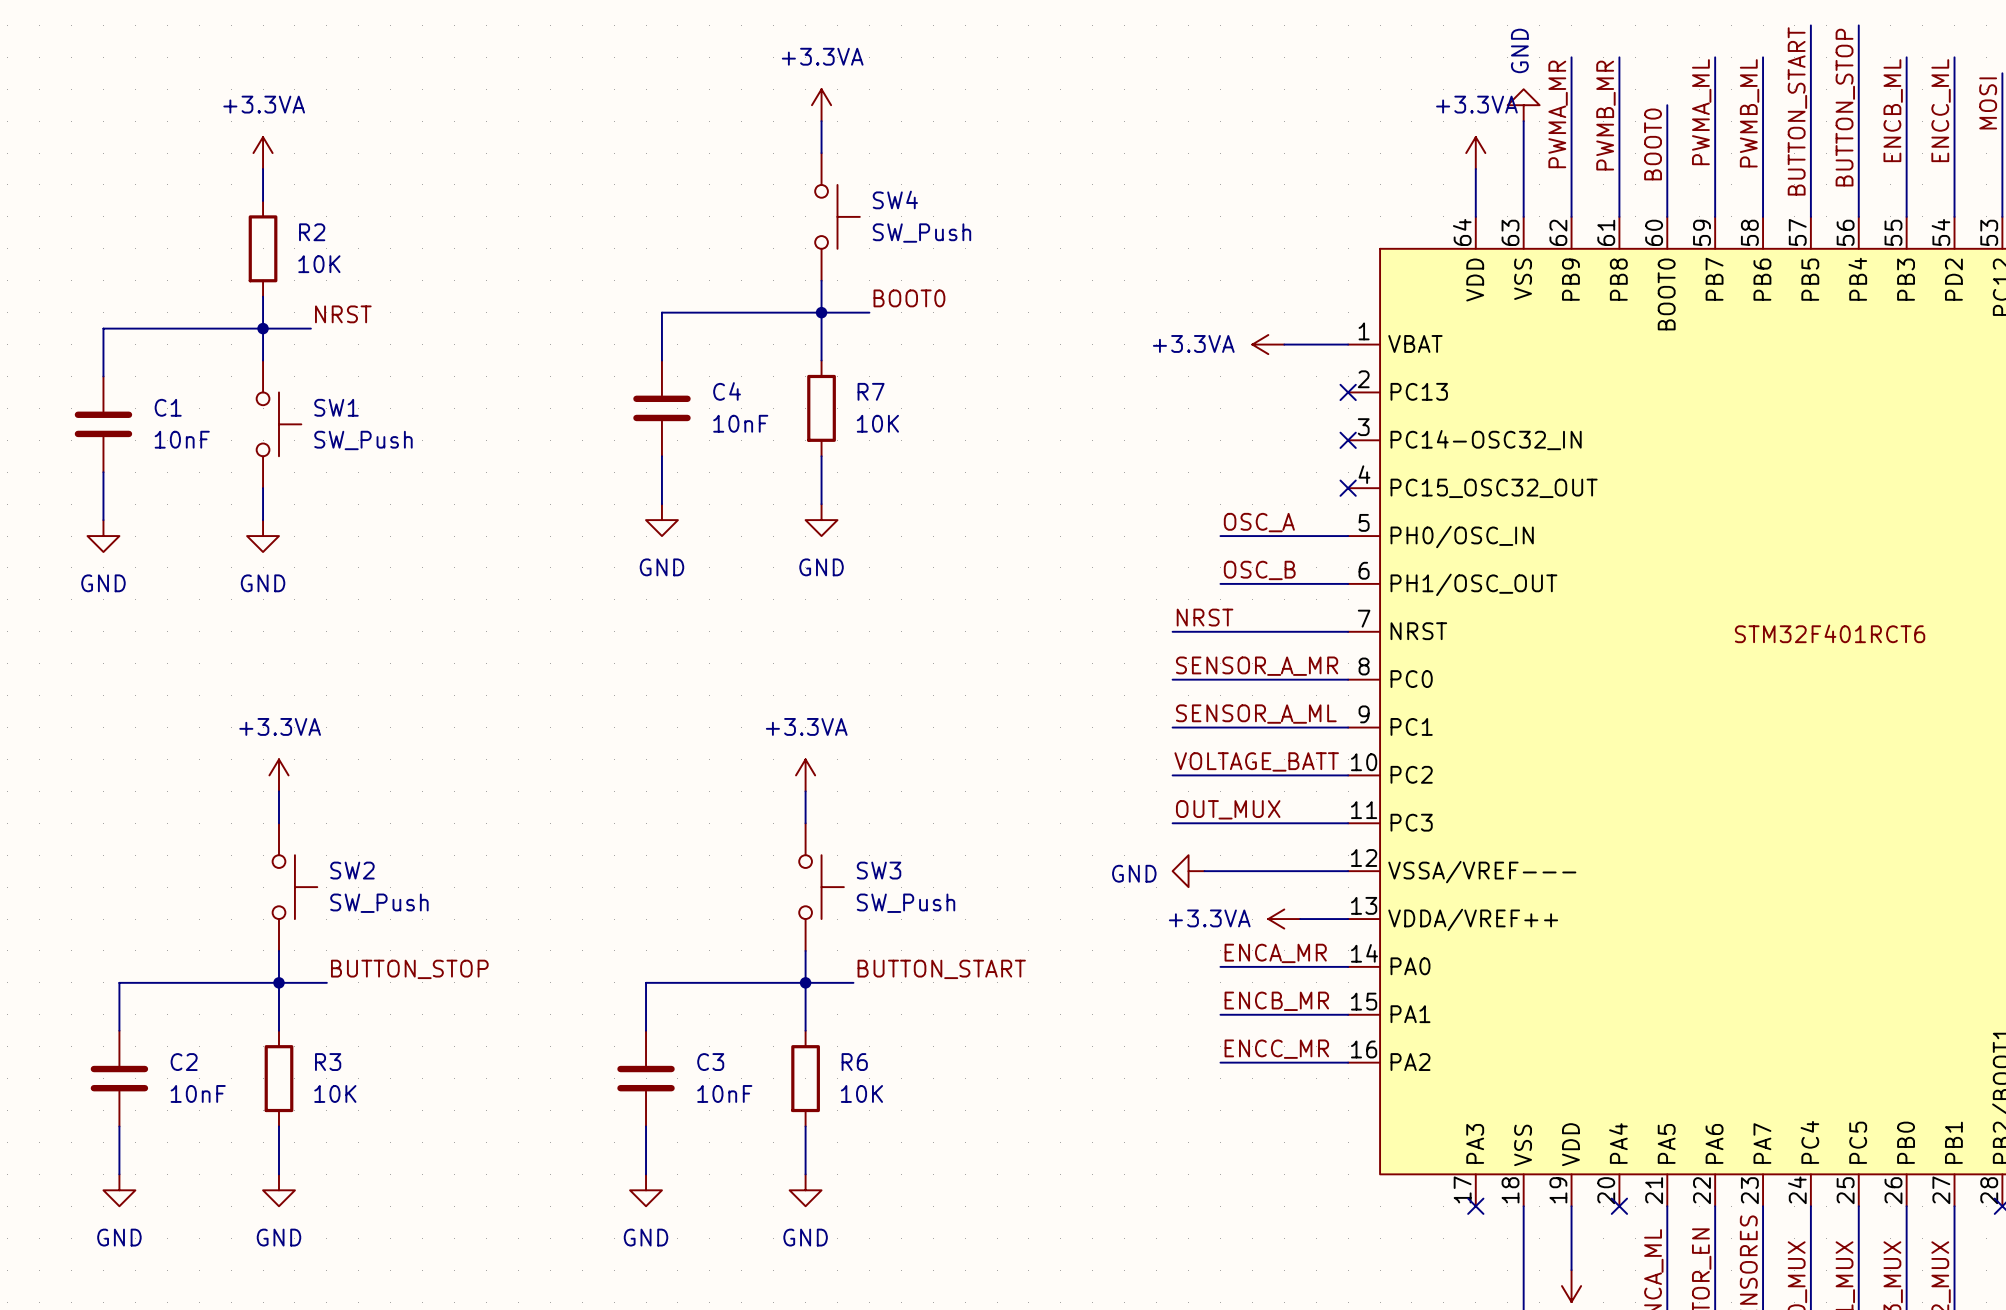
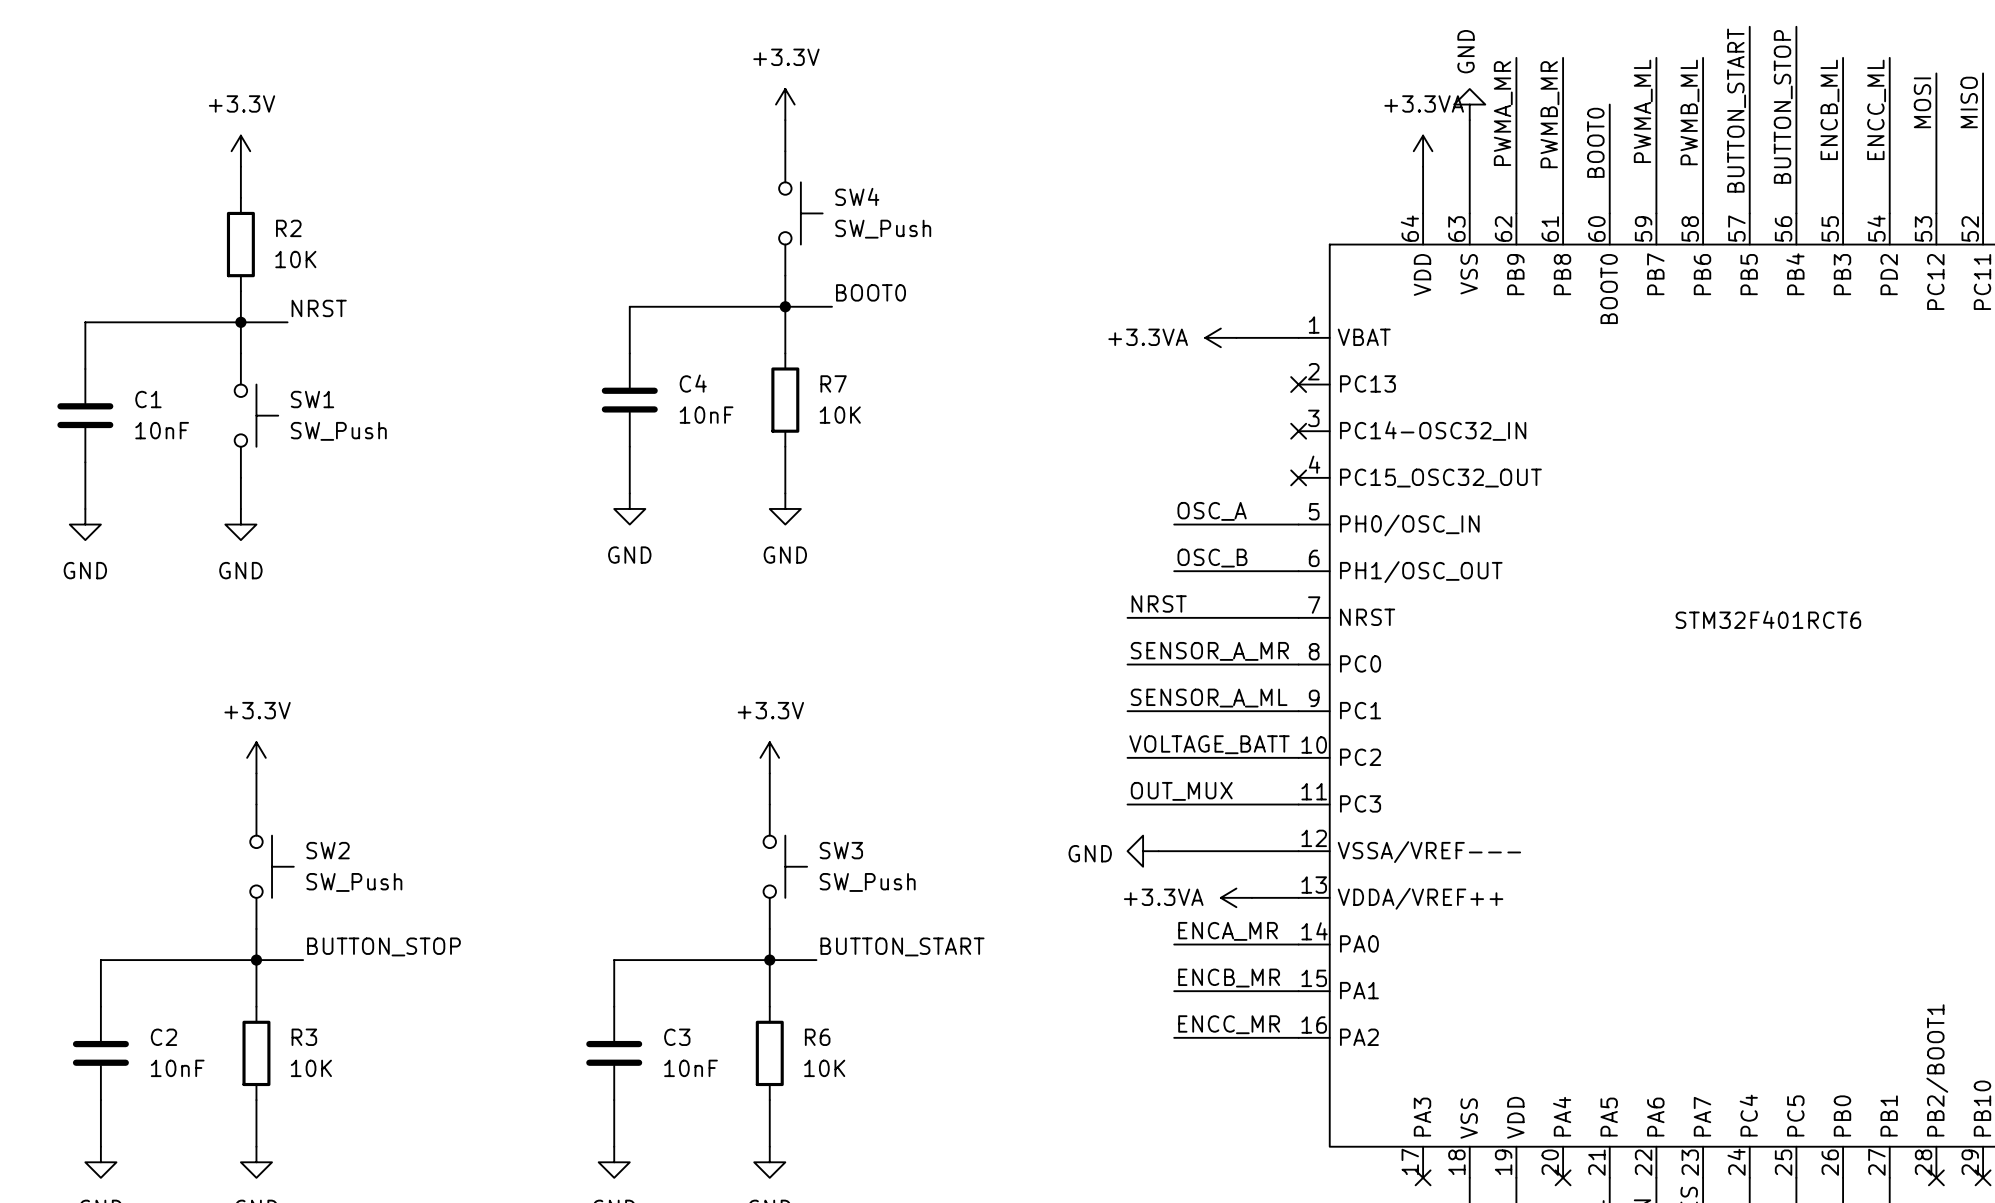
power symbol: +3.3VA (821, 105) -> +3.3V (785, 104)
power symbol: +3.3VA (263, 153) -> +3.3V (240, 151)
power symbol: +3.3VA (278, 775) -> +3.3V (256, 757)
power symbol: +3.3VA (805, 775) -> +3.3V (769, 757)

